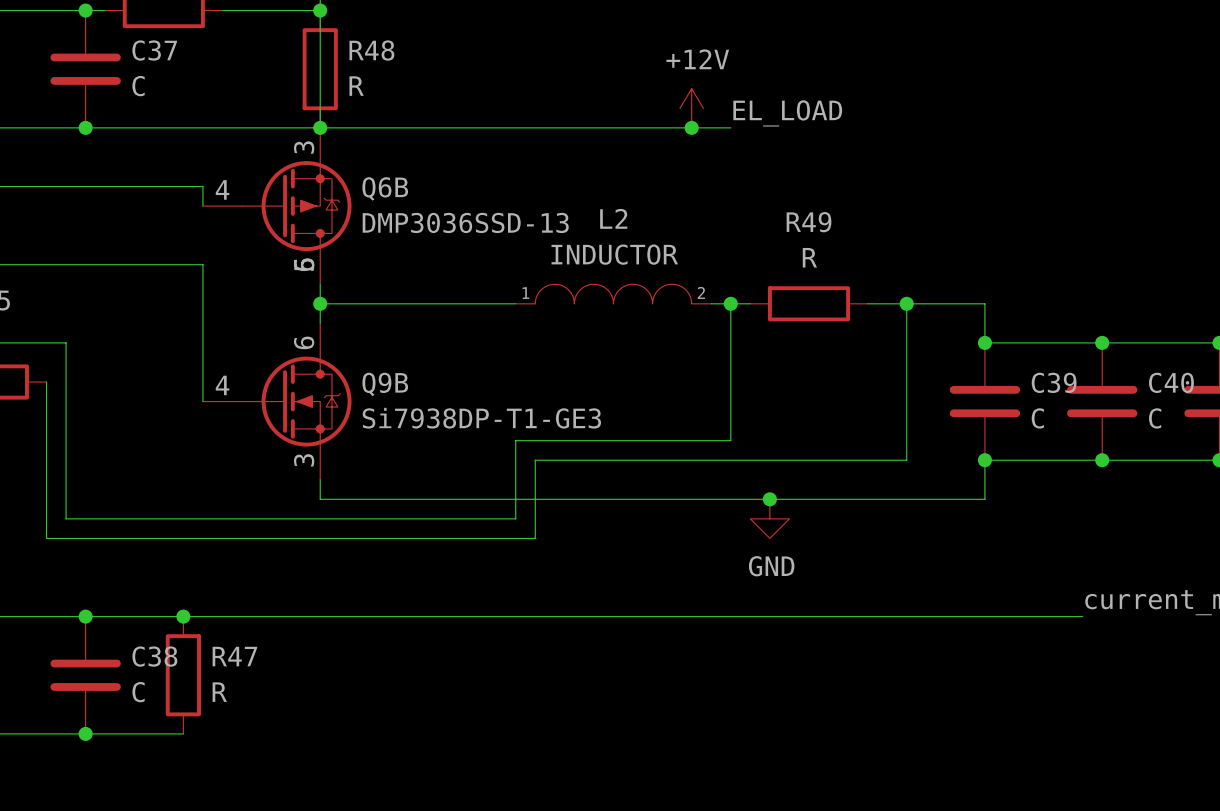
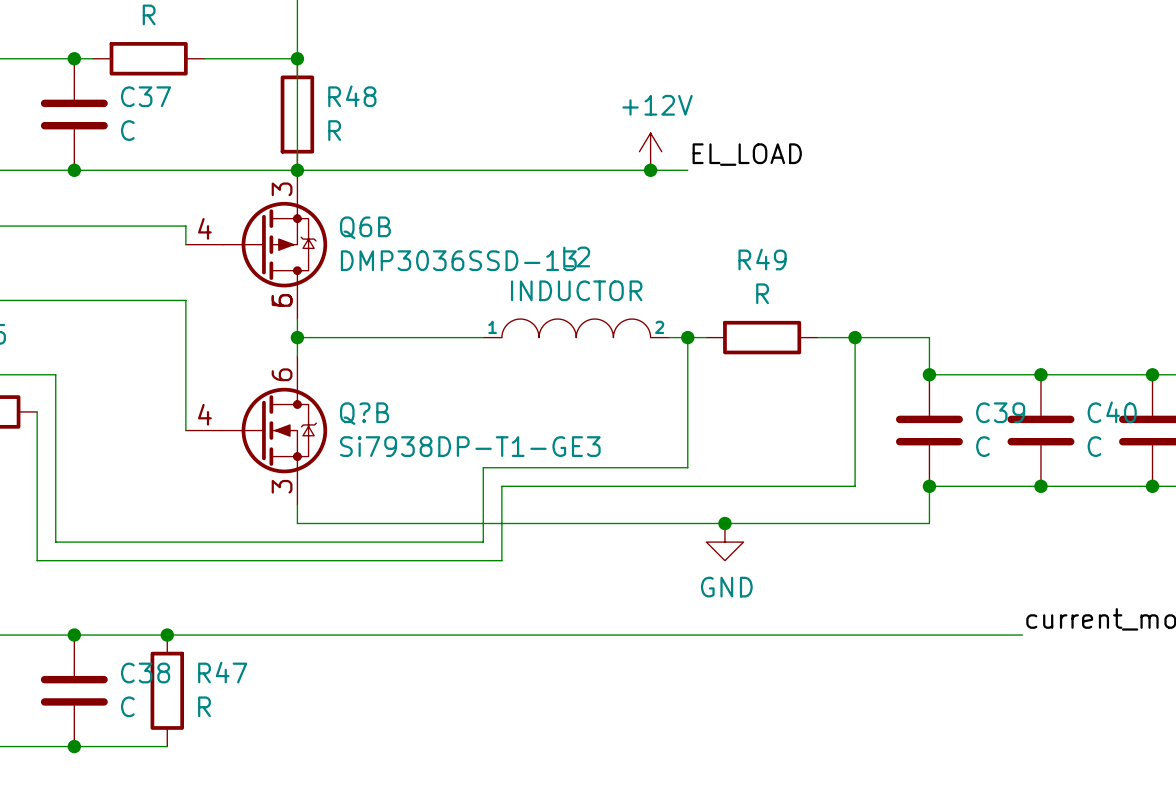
Q9B name: Q9B (385, 384) -> Q?B (364, 413)

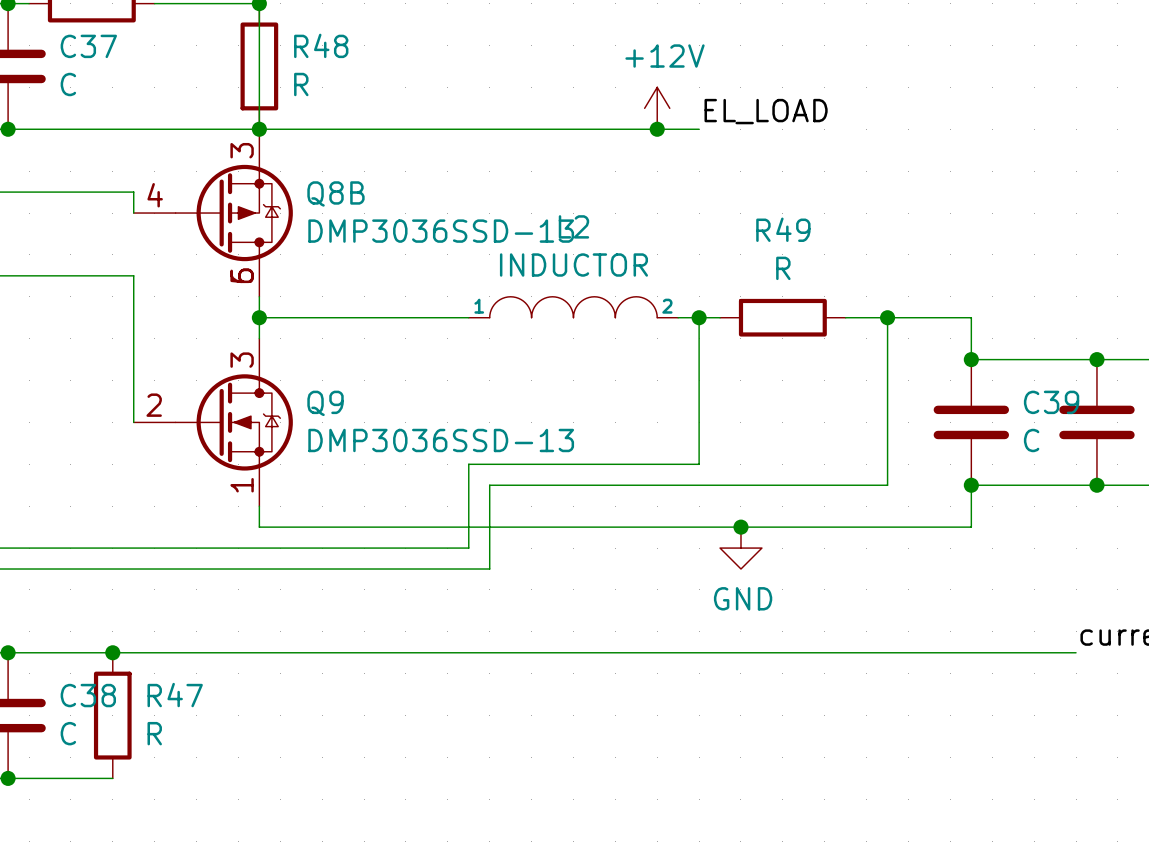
Q6B name: Q6B (365, 227) -> Q8B (335, 193)
Q?B: Si7938DP-T1-GE3 (256, 430) -> none
Q9: none -> DMP3036SSD-13 (213, 422)

